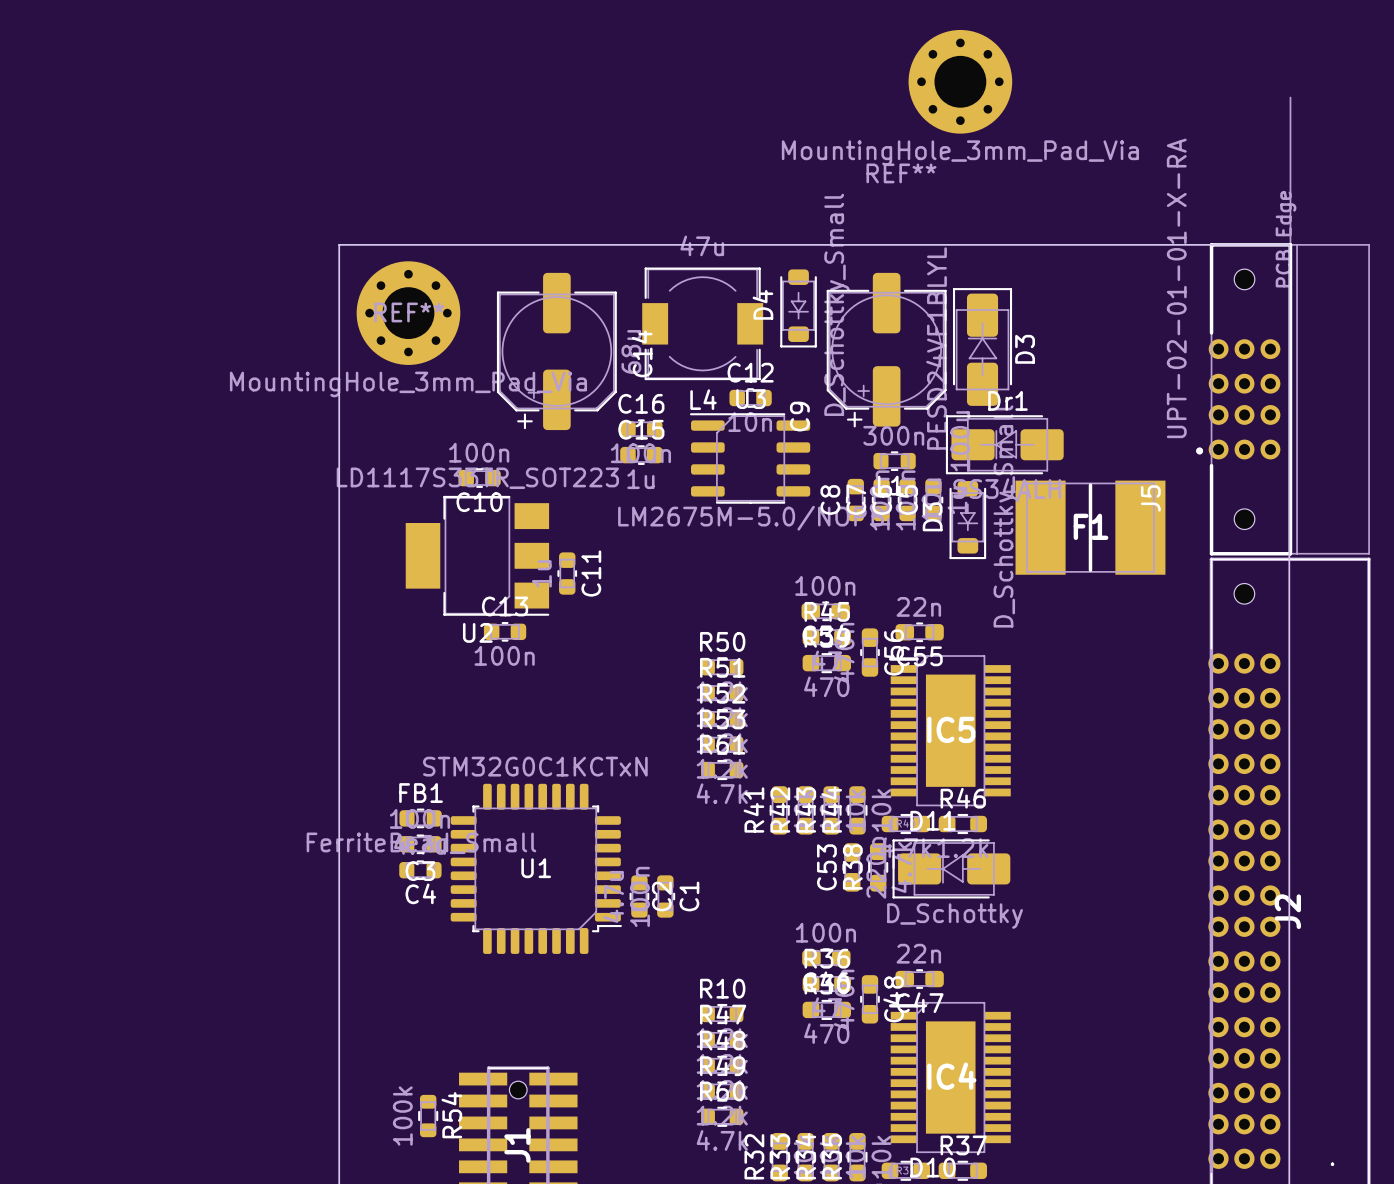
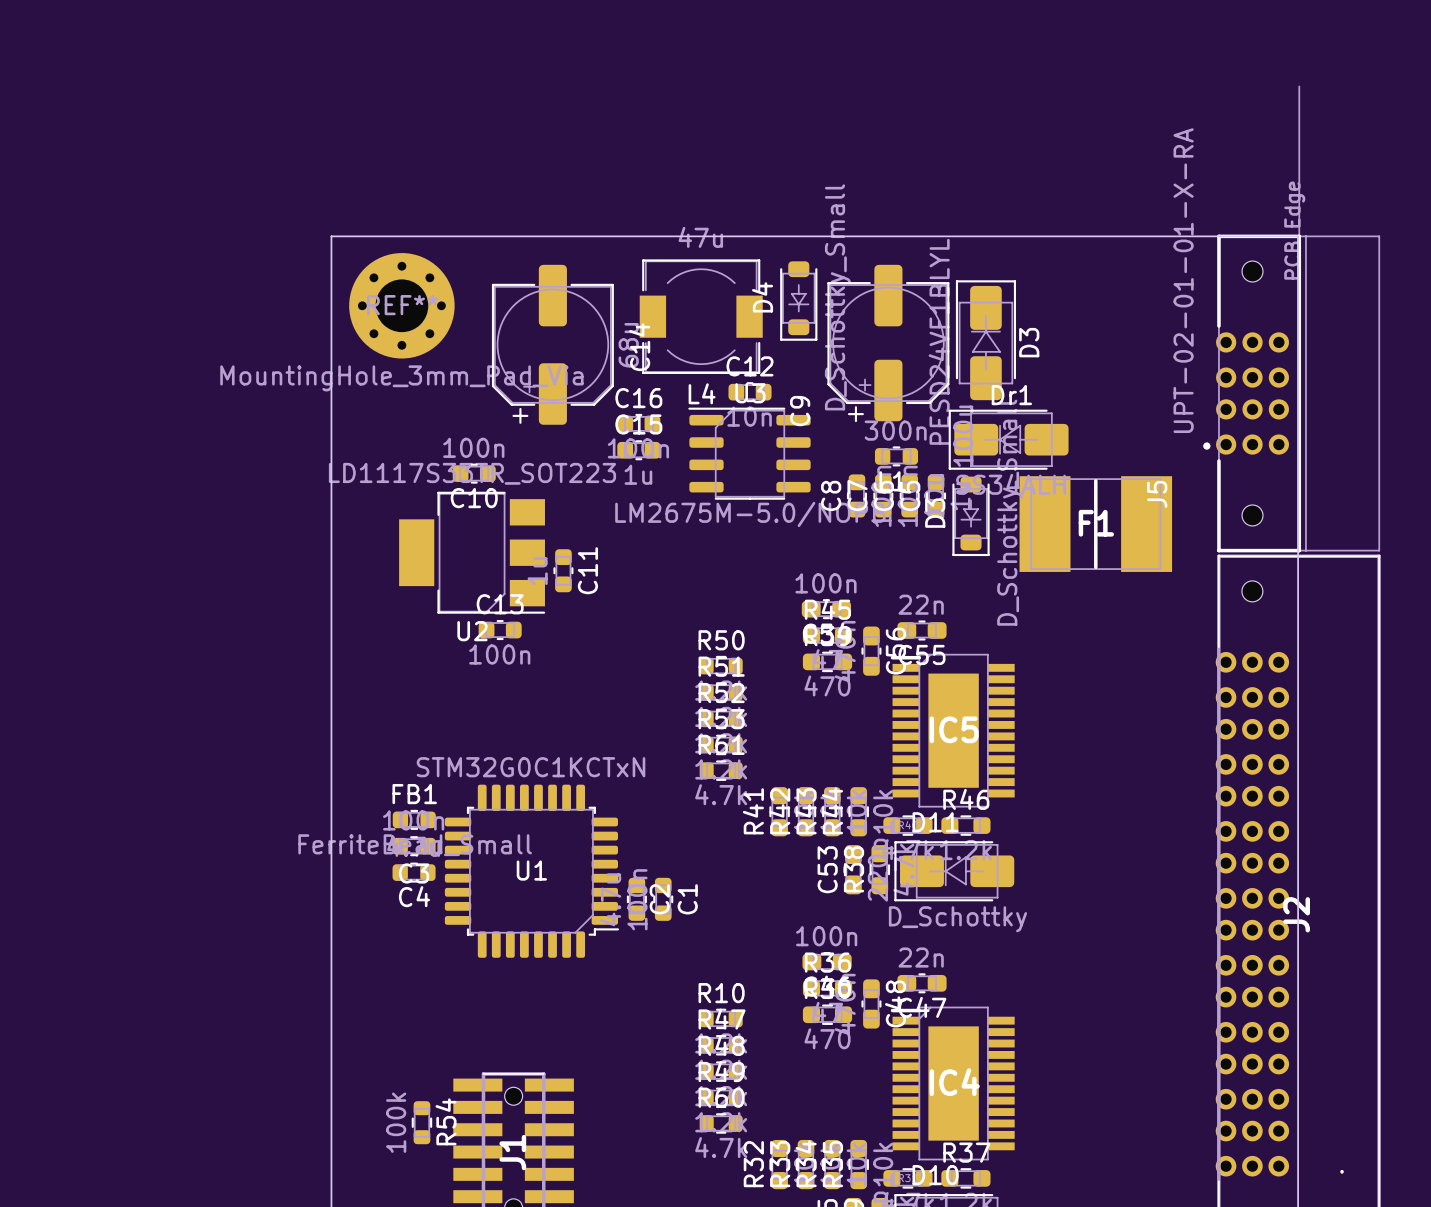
REF**: MountingHole_3mm_Pad_Via (960, 81) -> none

